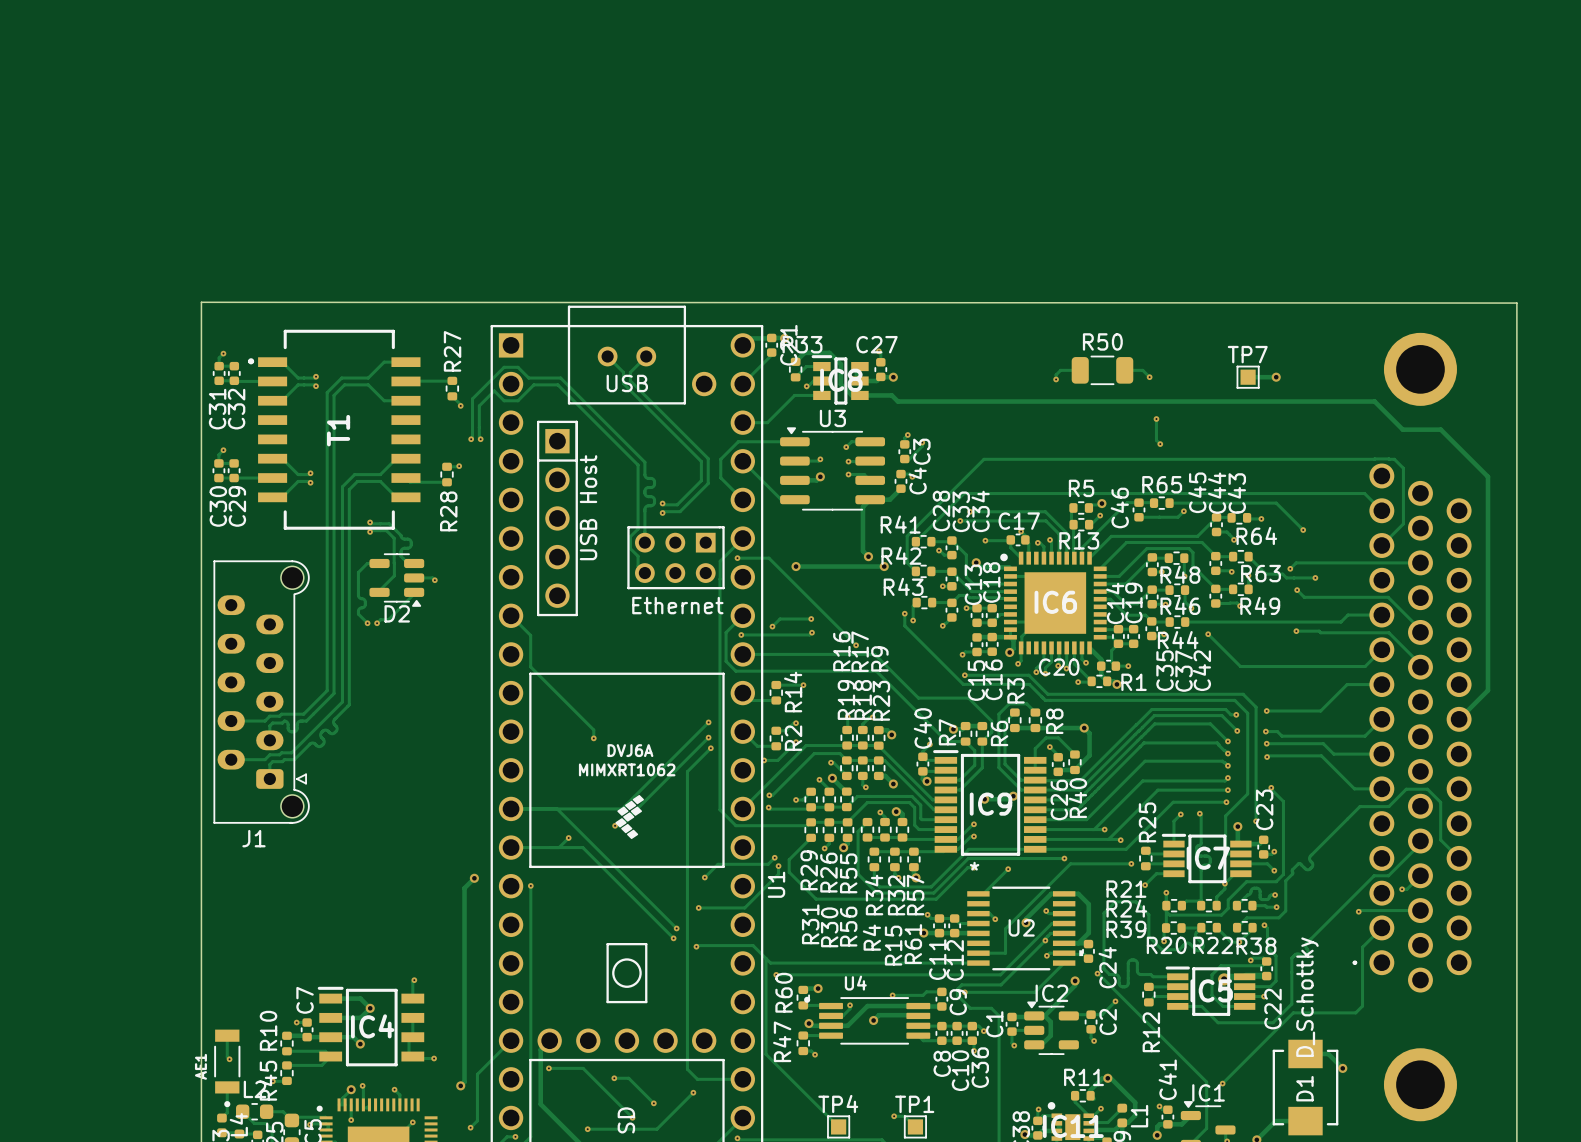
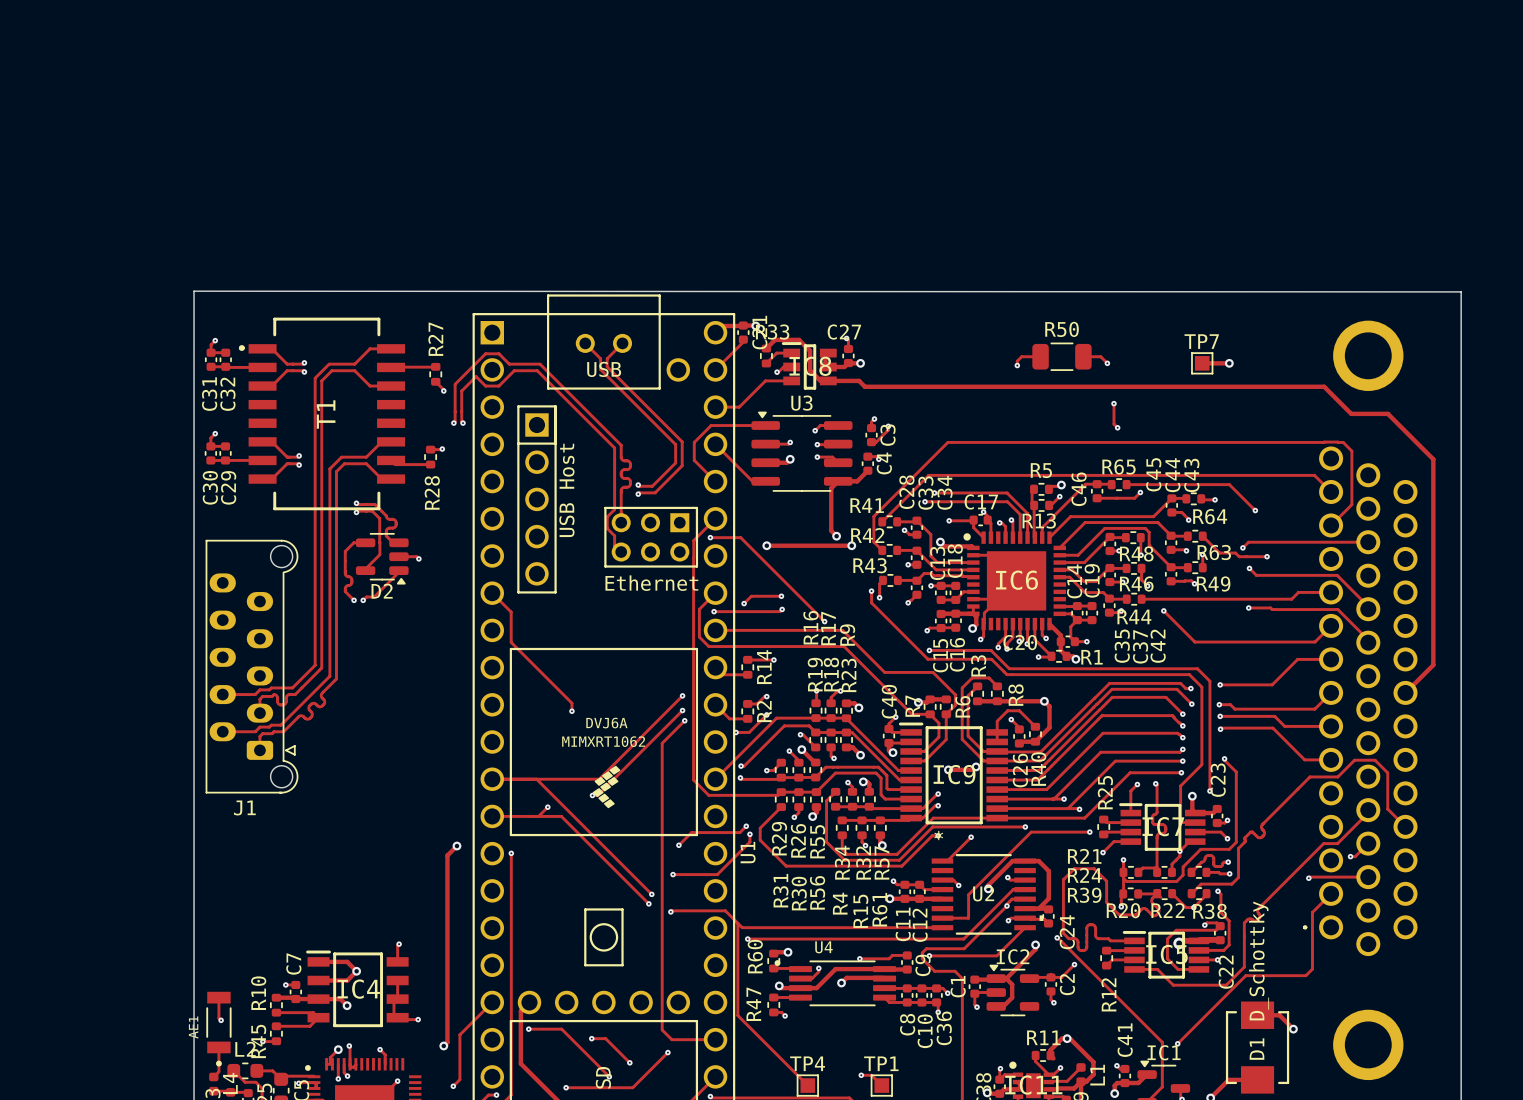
track: none -> (344, 1064) (344, 1072) (347, 1076)
via: none -> (347, 1076)

